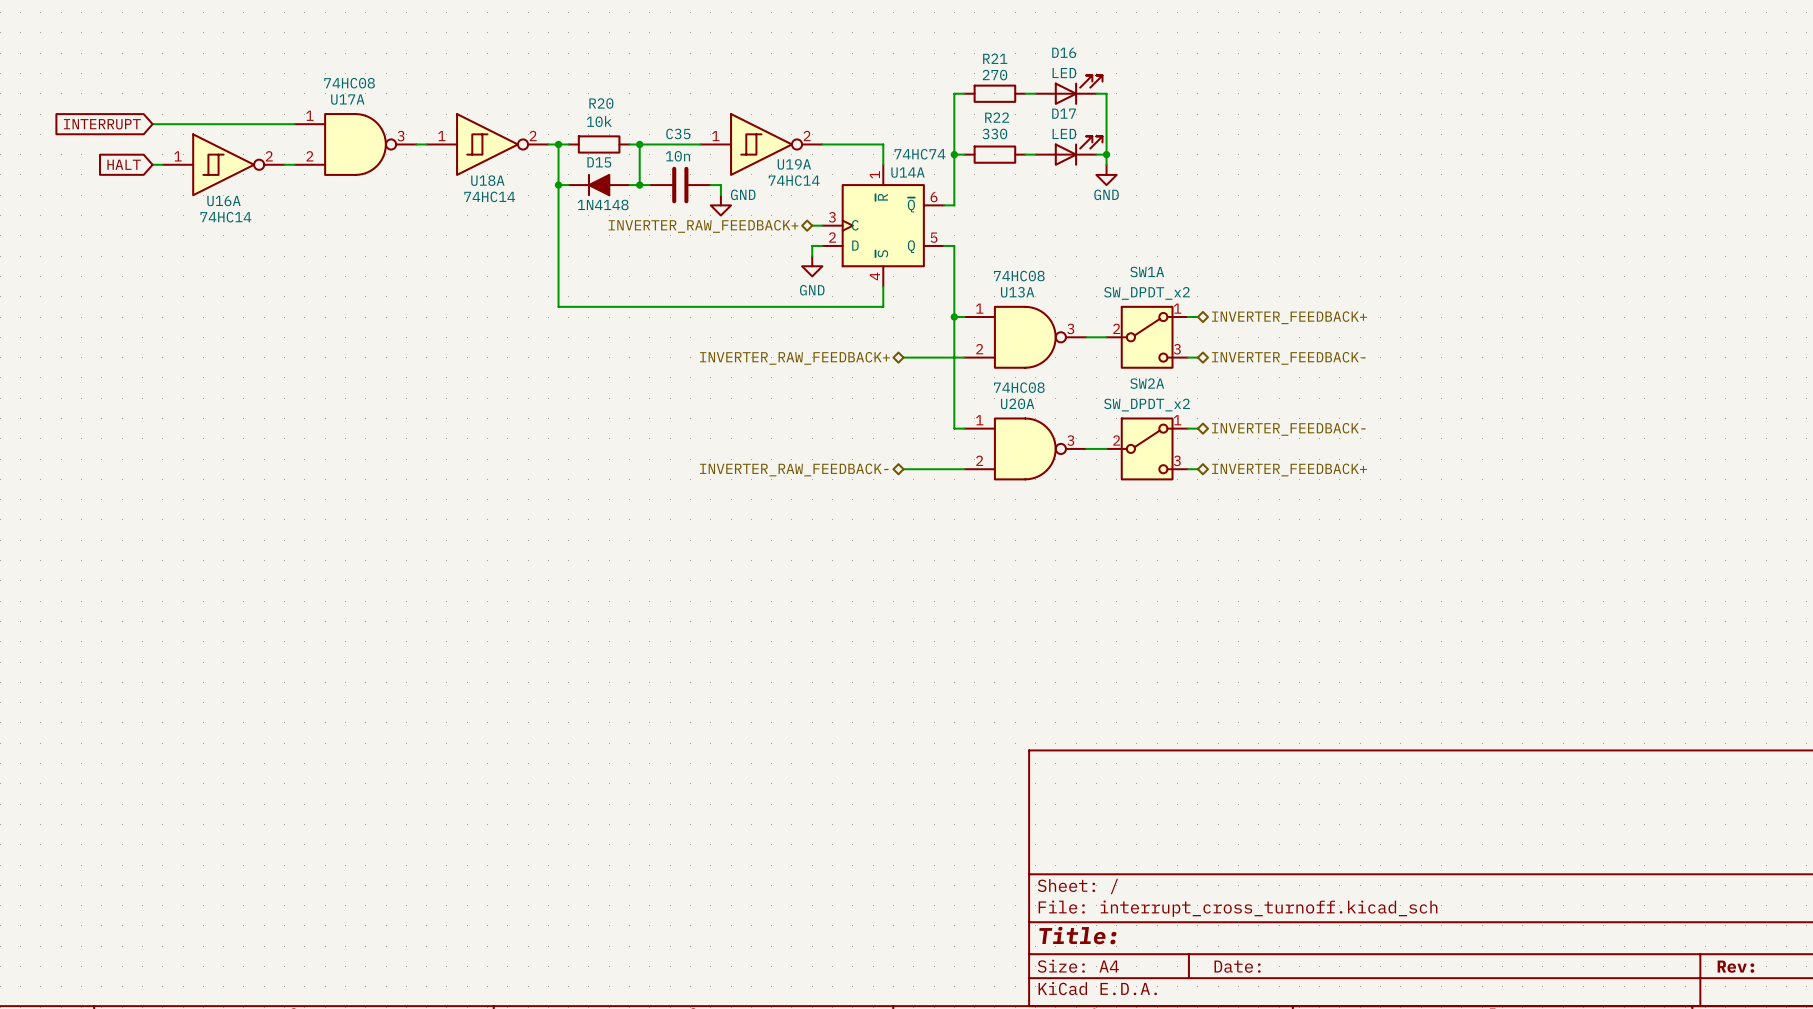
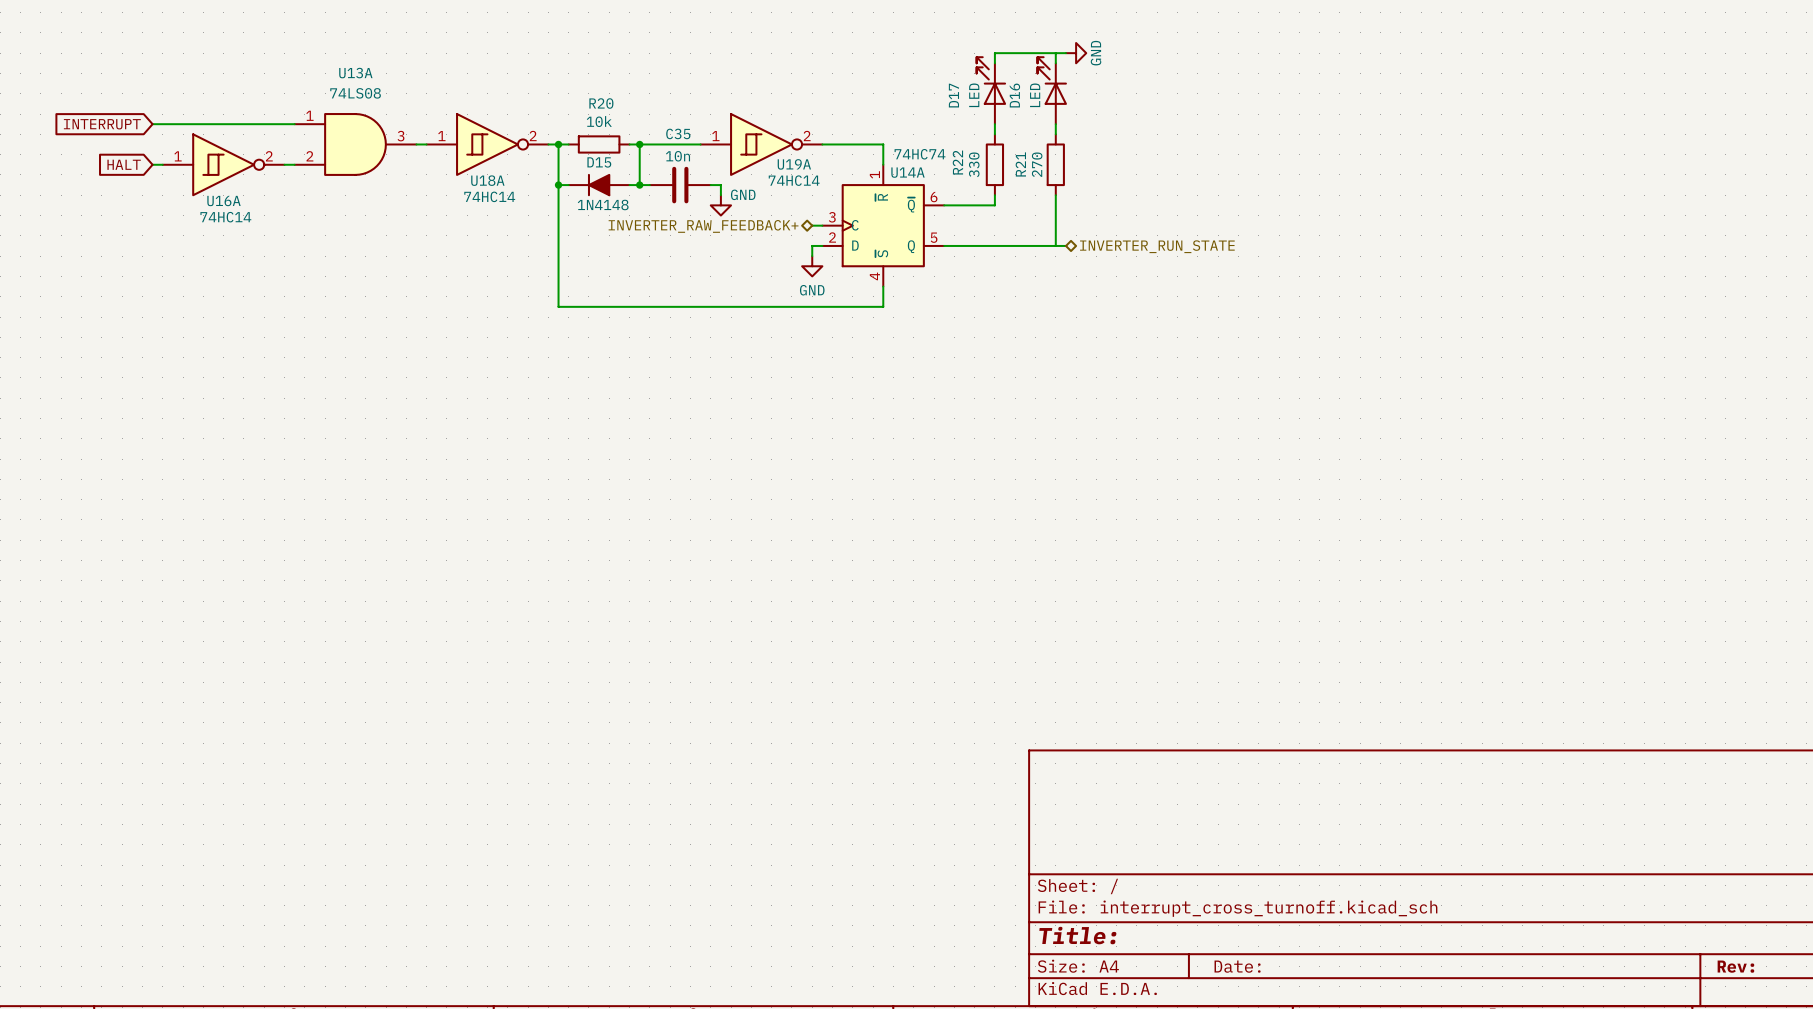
wire: none -> (1055, 53) (1055, 63)
wire: none -> (1065, 53) (994, 53) (994, 63)
R21 name position: R21 (995, 58) -> R21 (1020, 164)
R21 value position: 270 (994, 75) -> 270 (1037, 164)
D16 rotation: 0° (1078, 90) -> 90° counterclockwise (1052, 81)
wire: (964, 93) (954, 93) (954, 205) -> (994, 195) (994, 205) (954, 205)
R21 rotation: 0° (994, 93) -> 90° clockwise (1055, 164)
R21 position: (994, 93) -> (1055, 164)
wire: (1025, 93) (1035, 93) -> none
wire: (1096, 93) (1106, 93) (1106, 164) -> none
R22 name position: R22 (997, 117) -> R22 (957, 162)
wire: none -> (994, 124) (994, 134)
wire: none -> (1055, 124) (1055, 134)
R22 value position: 330 (994, 133) -> 330 (974, 164)
U17A: 74HC08 (355, 144) -> none
D17 position: (1068, 151) -> (991, 90)
D17 rotation: 0° (1078, 151) -> 90° counterclockwise (991, 81)
wire: (954, 154) (964, 154) -> none
junction: (954, 154) -> none
R22 rotation: 0° (994, 154) -> 90° clockwise (994, 164)
wire: (1025, 154) (1035, 154) -> none
wire: (1096, 154) (1106, 154) -> none
junction: (1106, 154) -> none
power symbol rotation: 0° (1106, 174) -> 90° counterclockwise (1076, 53)
power symbol position: GND (1106, 174) -> GND (1076, 53)
wire: none -> (1055, 195) (1055, 245)
wire: (954, 245) (954, 428) (964, 428) -> (954, 245) (1065, 245)
hierarchical label: none -> INVERTER_RUN_STATE (1157, 246)
U13A value: 74HC08 (1019, 276) -> 74LS08 (355, 93)
U13A name position: U13A (1017, 292) -> U13A (355, 73)
U13A symbol: [964, 305, 1087, 369] -> [294, 113, 417, 176]
wire: (954, 317) (964, 317) -> none
junction: (954, 317) -> none
wire: (1187, 317) (1197, 317) -> none
hierarchical label: INVERTER_FEEDBACK+ (1289, 317) -> none
wire: (1086, 337) (1106, 337) -> none
SW1A: SW_DPDT_x2 (1147, 337) -> none
wire: (903, 357) (964, 357) -> none
wire: (1187, 357) (1197, 357) -> none
hierarchical label: INVERTER_RAW_FEEDBACK+ (794, 358) -> none
hierarchical label: INVERTER_FEEDBACK- (1288, 358) -> none
wire: (1187, 428) (1197, 428) -> none
hierarchical label: INVERTER_FEEDBACK- (1288, 429) -> none
U20A: 74HC08 (1025, 448) -> none
wire: (1086, 448) (1106, 448) -> none
SW2A: SW_DPDT_x2 (1147, 448) -> none
hierarchical label: INVERTER_RAW_FEEDBACK- (794, 469) -> none
wire: (903, 469) (964, 469) -> none
wire: (1187, 469) (1197, 469) -> none
hierarchical label: INVERTER_FEEDBACK+ (1289, 469) -> none

